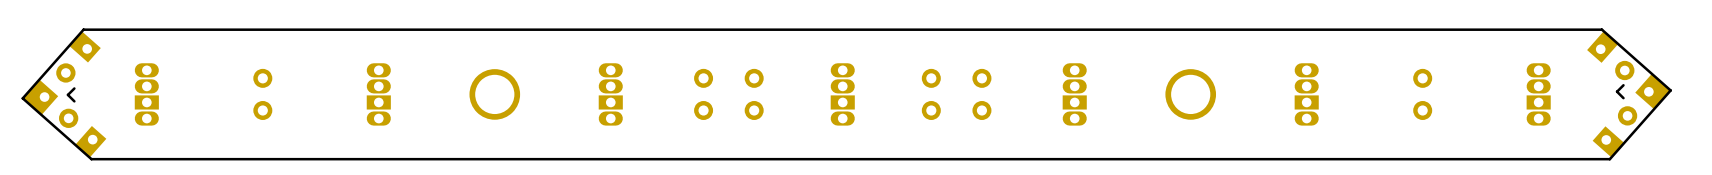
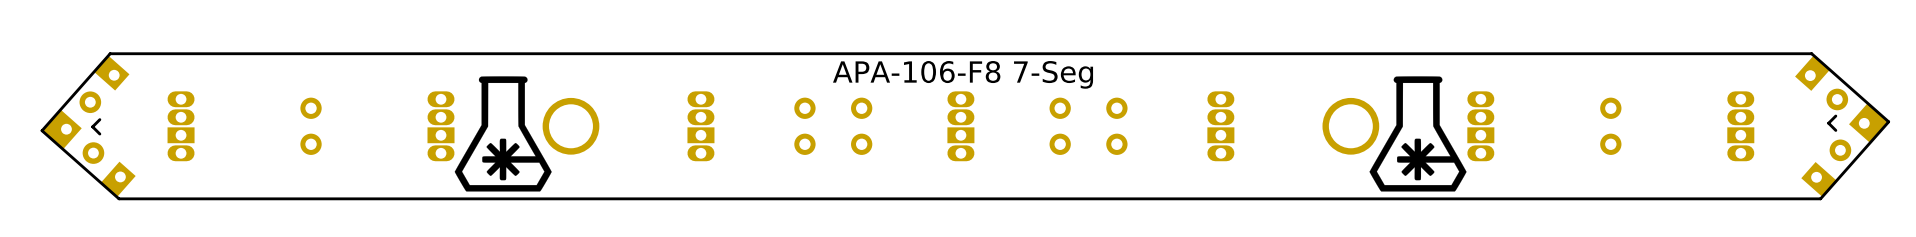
text: none -> APA-106-F8 7-Seg (963, 74)
drawing: none -> [454, 76, 552, 192]
drawing: none -> [1369, 76, 1467, 192]

